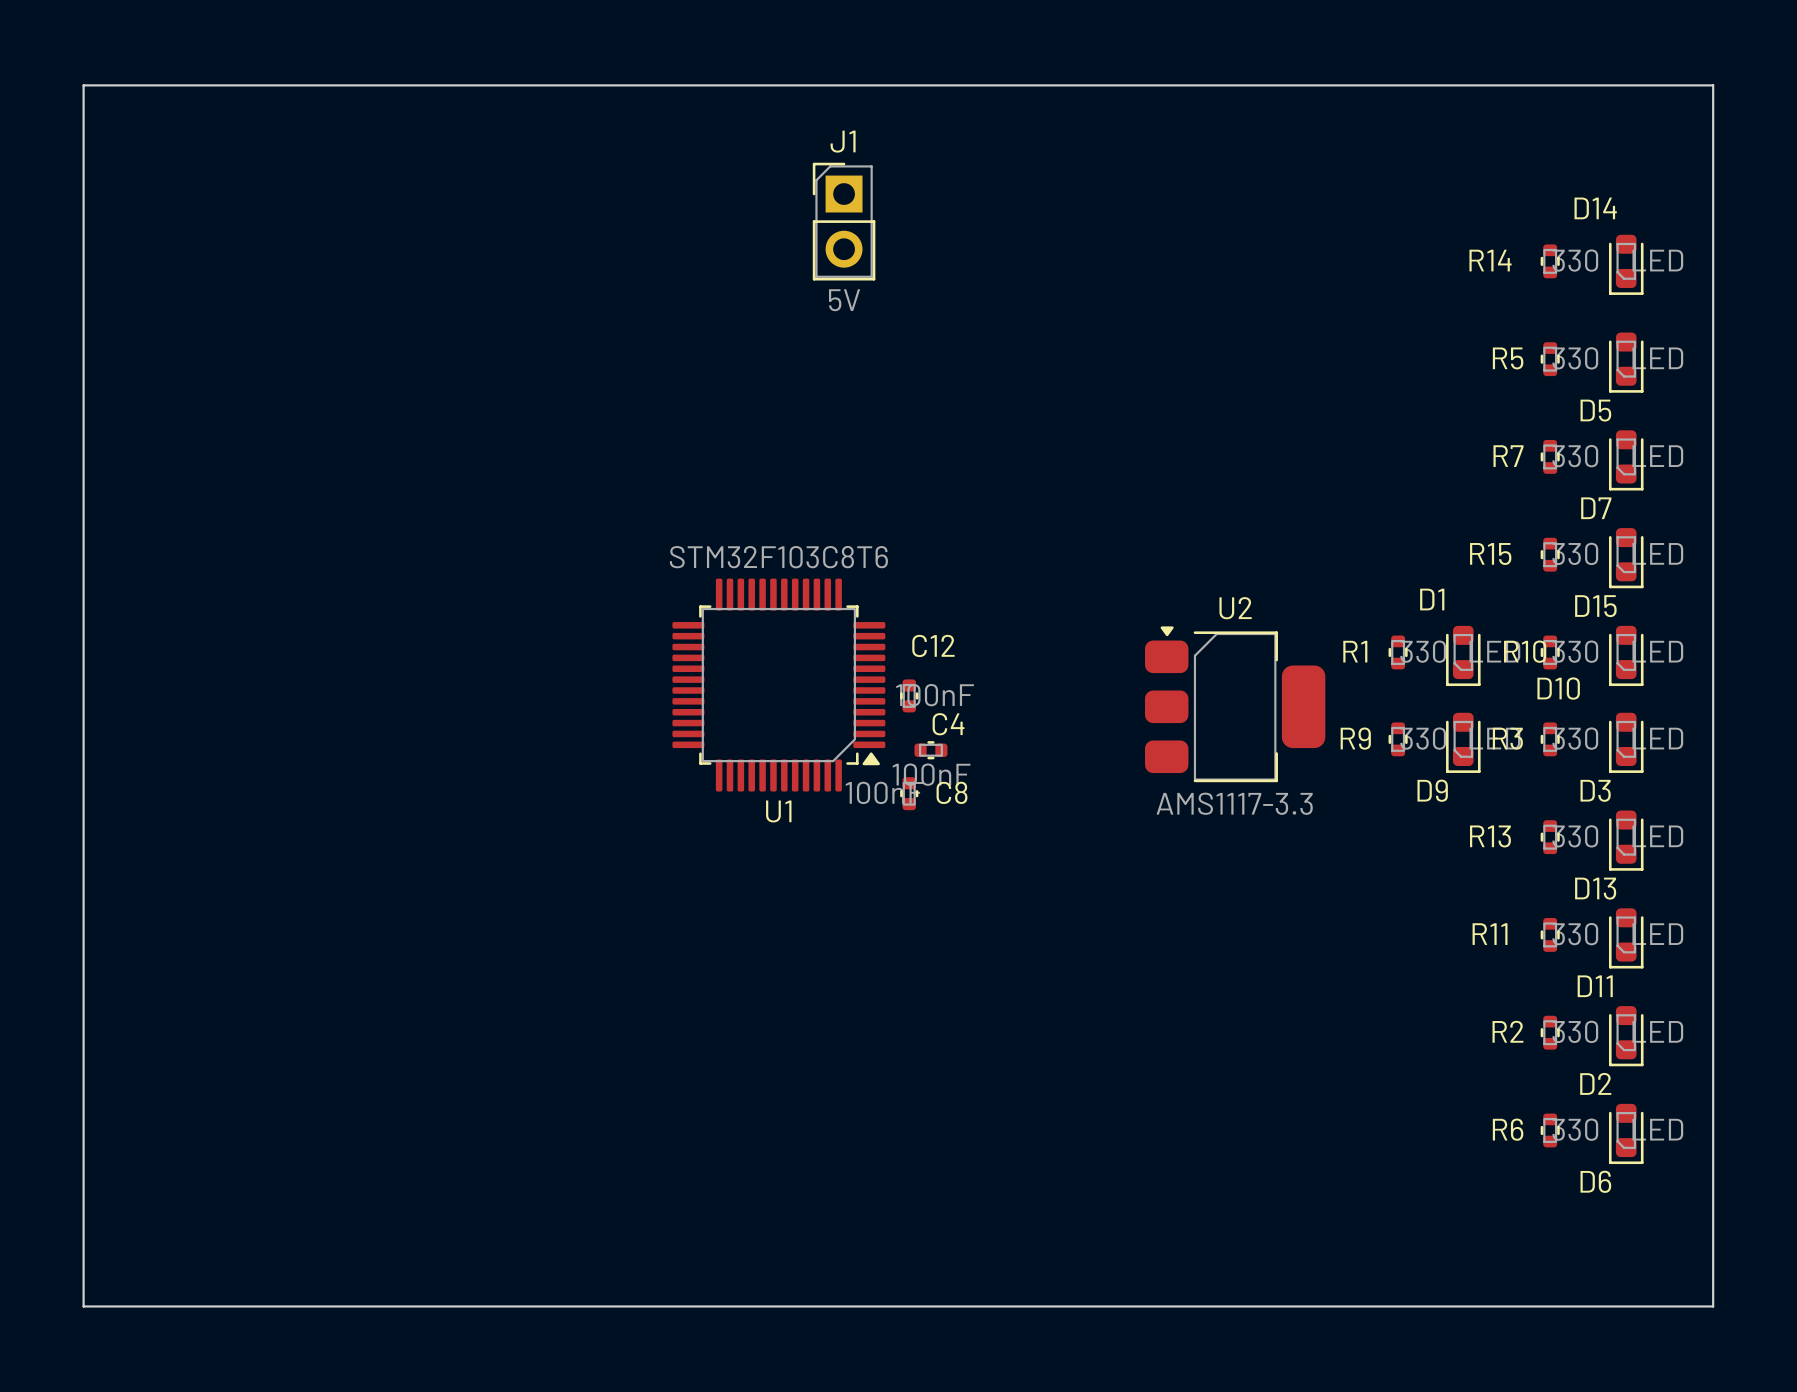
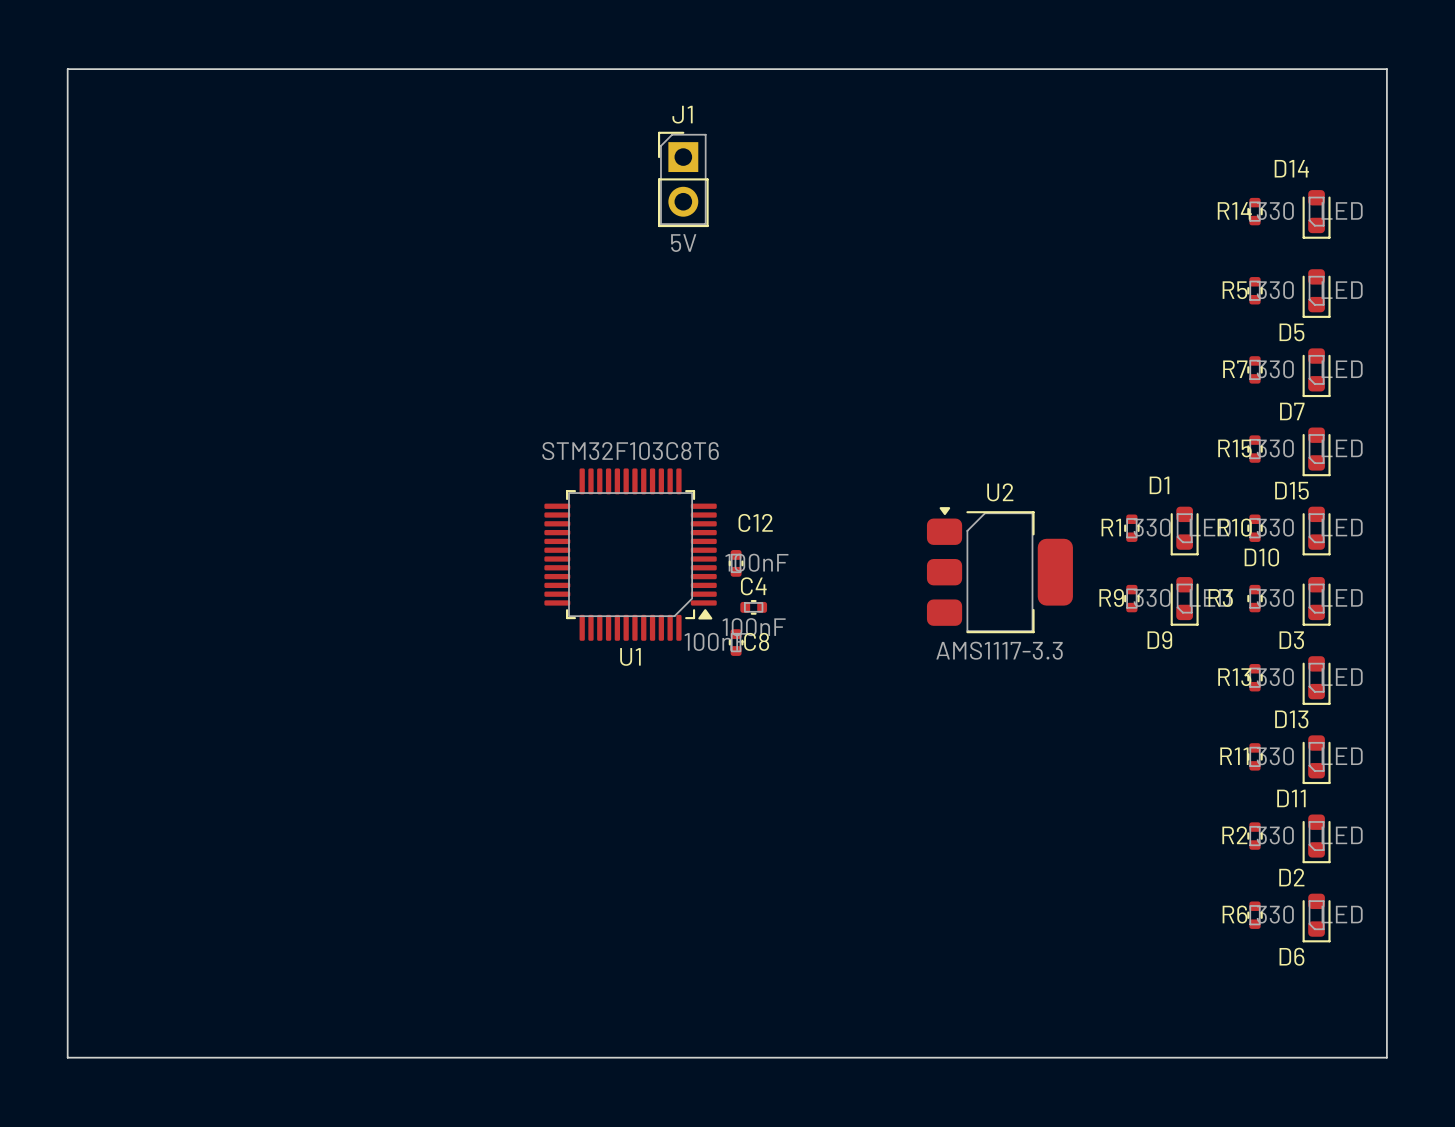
R14 name position: R14 (1490, 260) -> R14 (1234, 210)
R5 name position: R5 (1508, 358) -> R5 (1234, 290)
R7 name position: R7 (1508, 456) -> R7 (1235, 369)
R15 name position: R15 (1490, 553) -> R15 (1234, 448)
R1 name position: R1 (1355, 651) -> R1 (1111, 527)
C4 name position: C4 (948, 724) -> C4 (753, 586)
R9 name position: R9 (1355, 738) -> R9 (1111, 597)
C8 name position: C8 (952, 792) -> C8 (756, 641)
R13 name position: R13 (1490, 836) -> R13 (1234, 677)
R11 name position: R11 (1490, 934) -> R11 (1234, 756)
R2 name position: R2 (1507, 1031) -> R2 (1234, 835)
R6 name position: R6 (1508, 1129) -> R6 (1234, 914)

